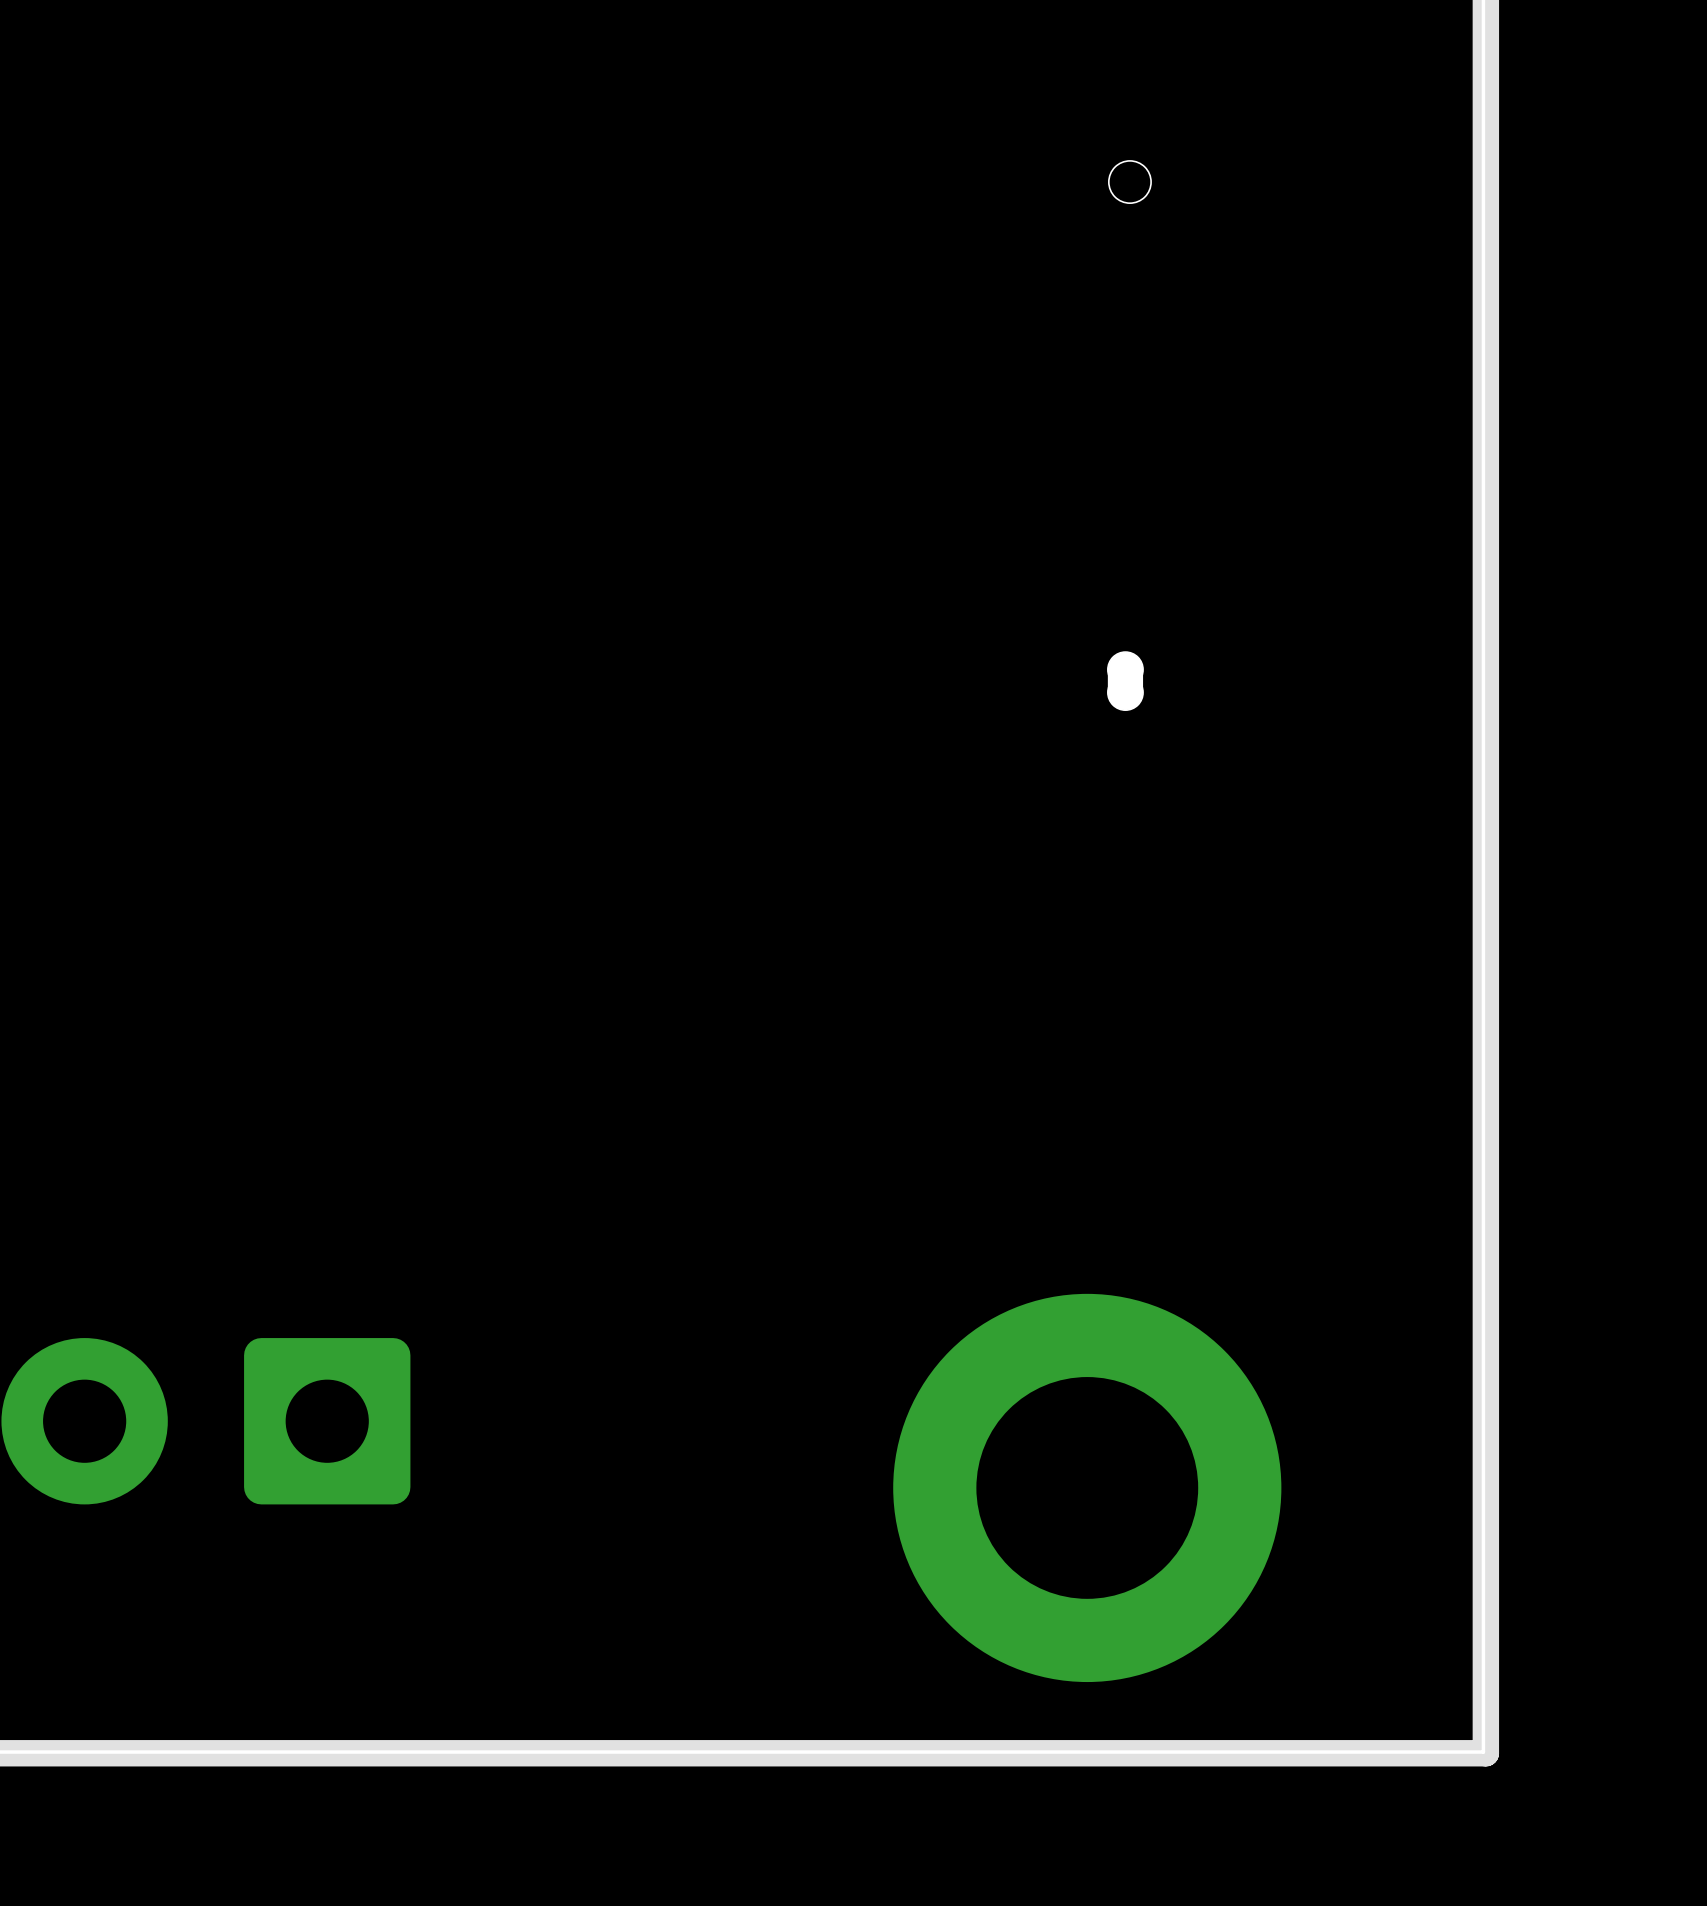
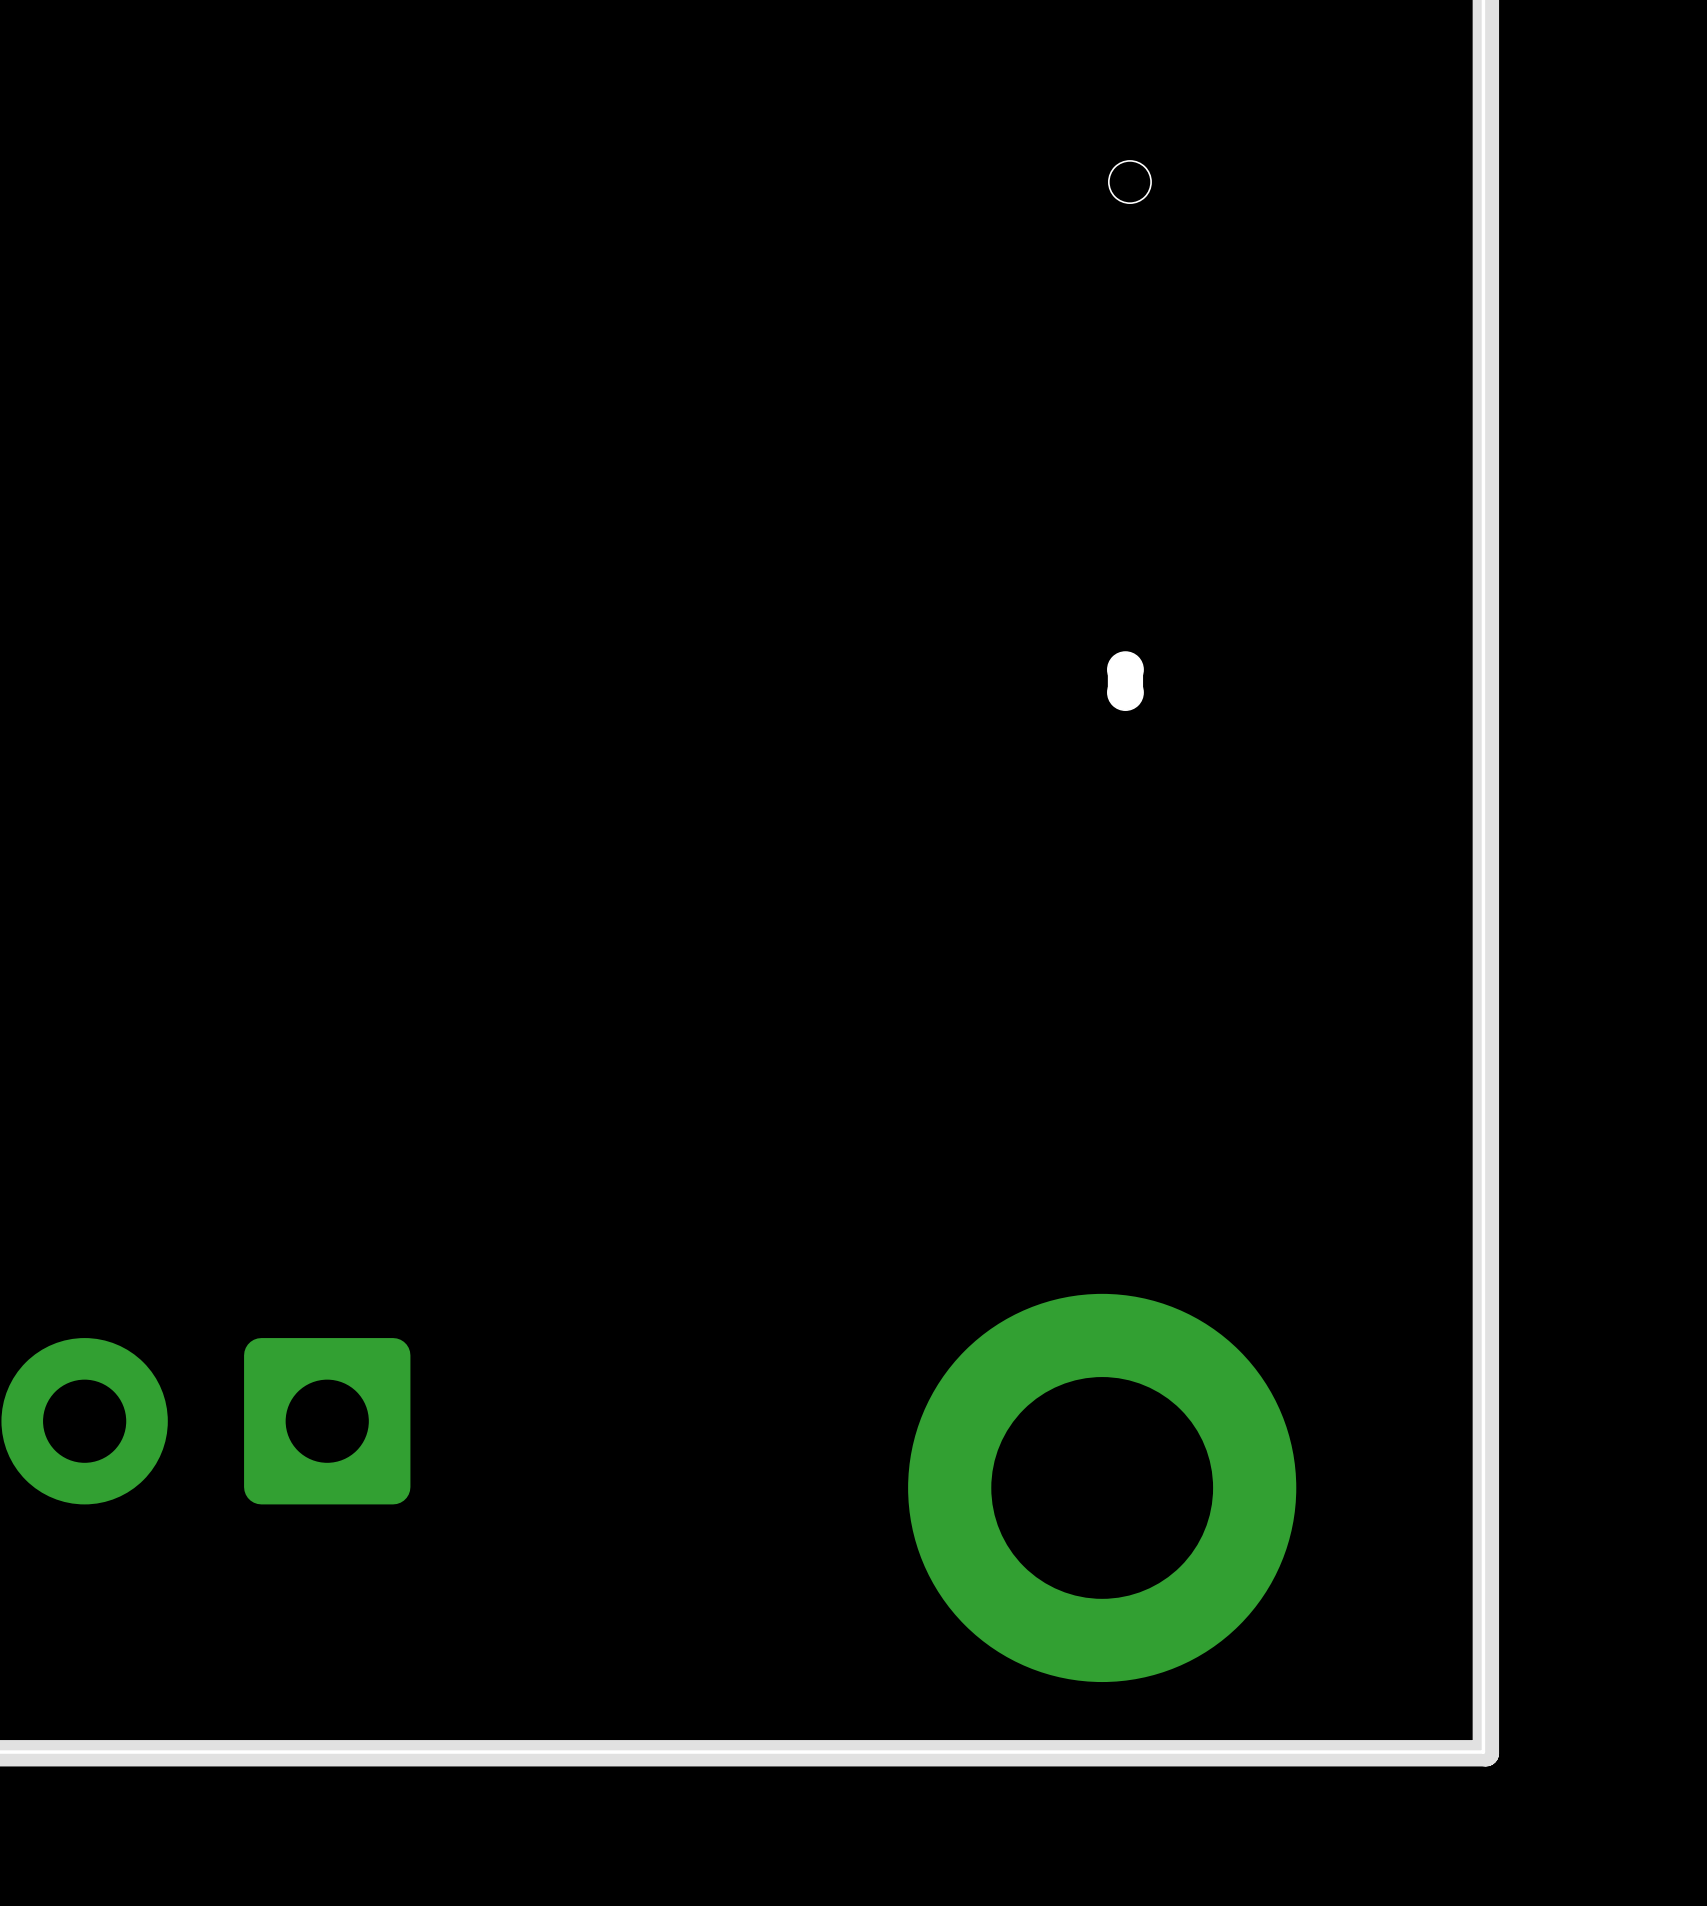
part position: (1087, 1487) -> (1102, 1487)

